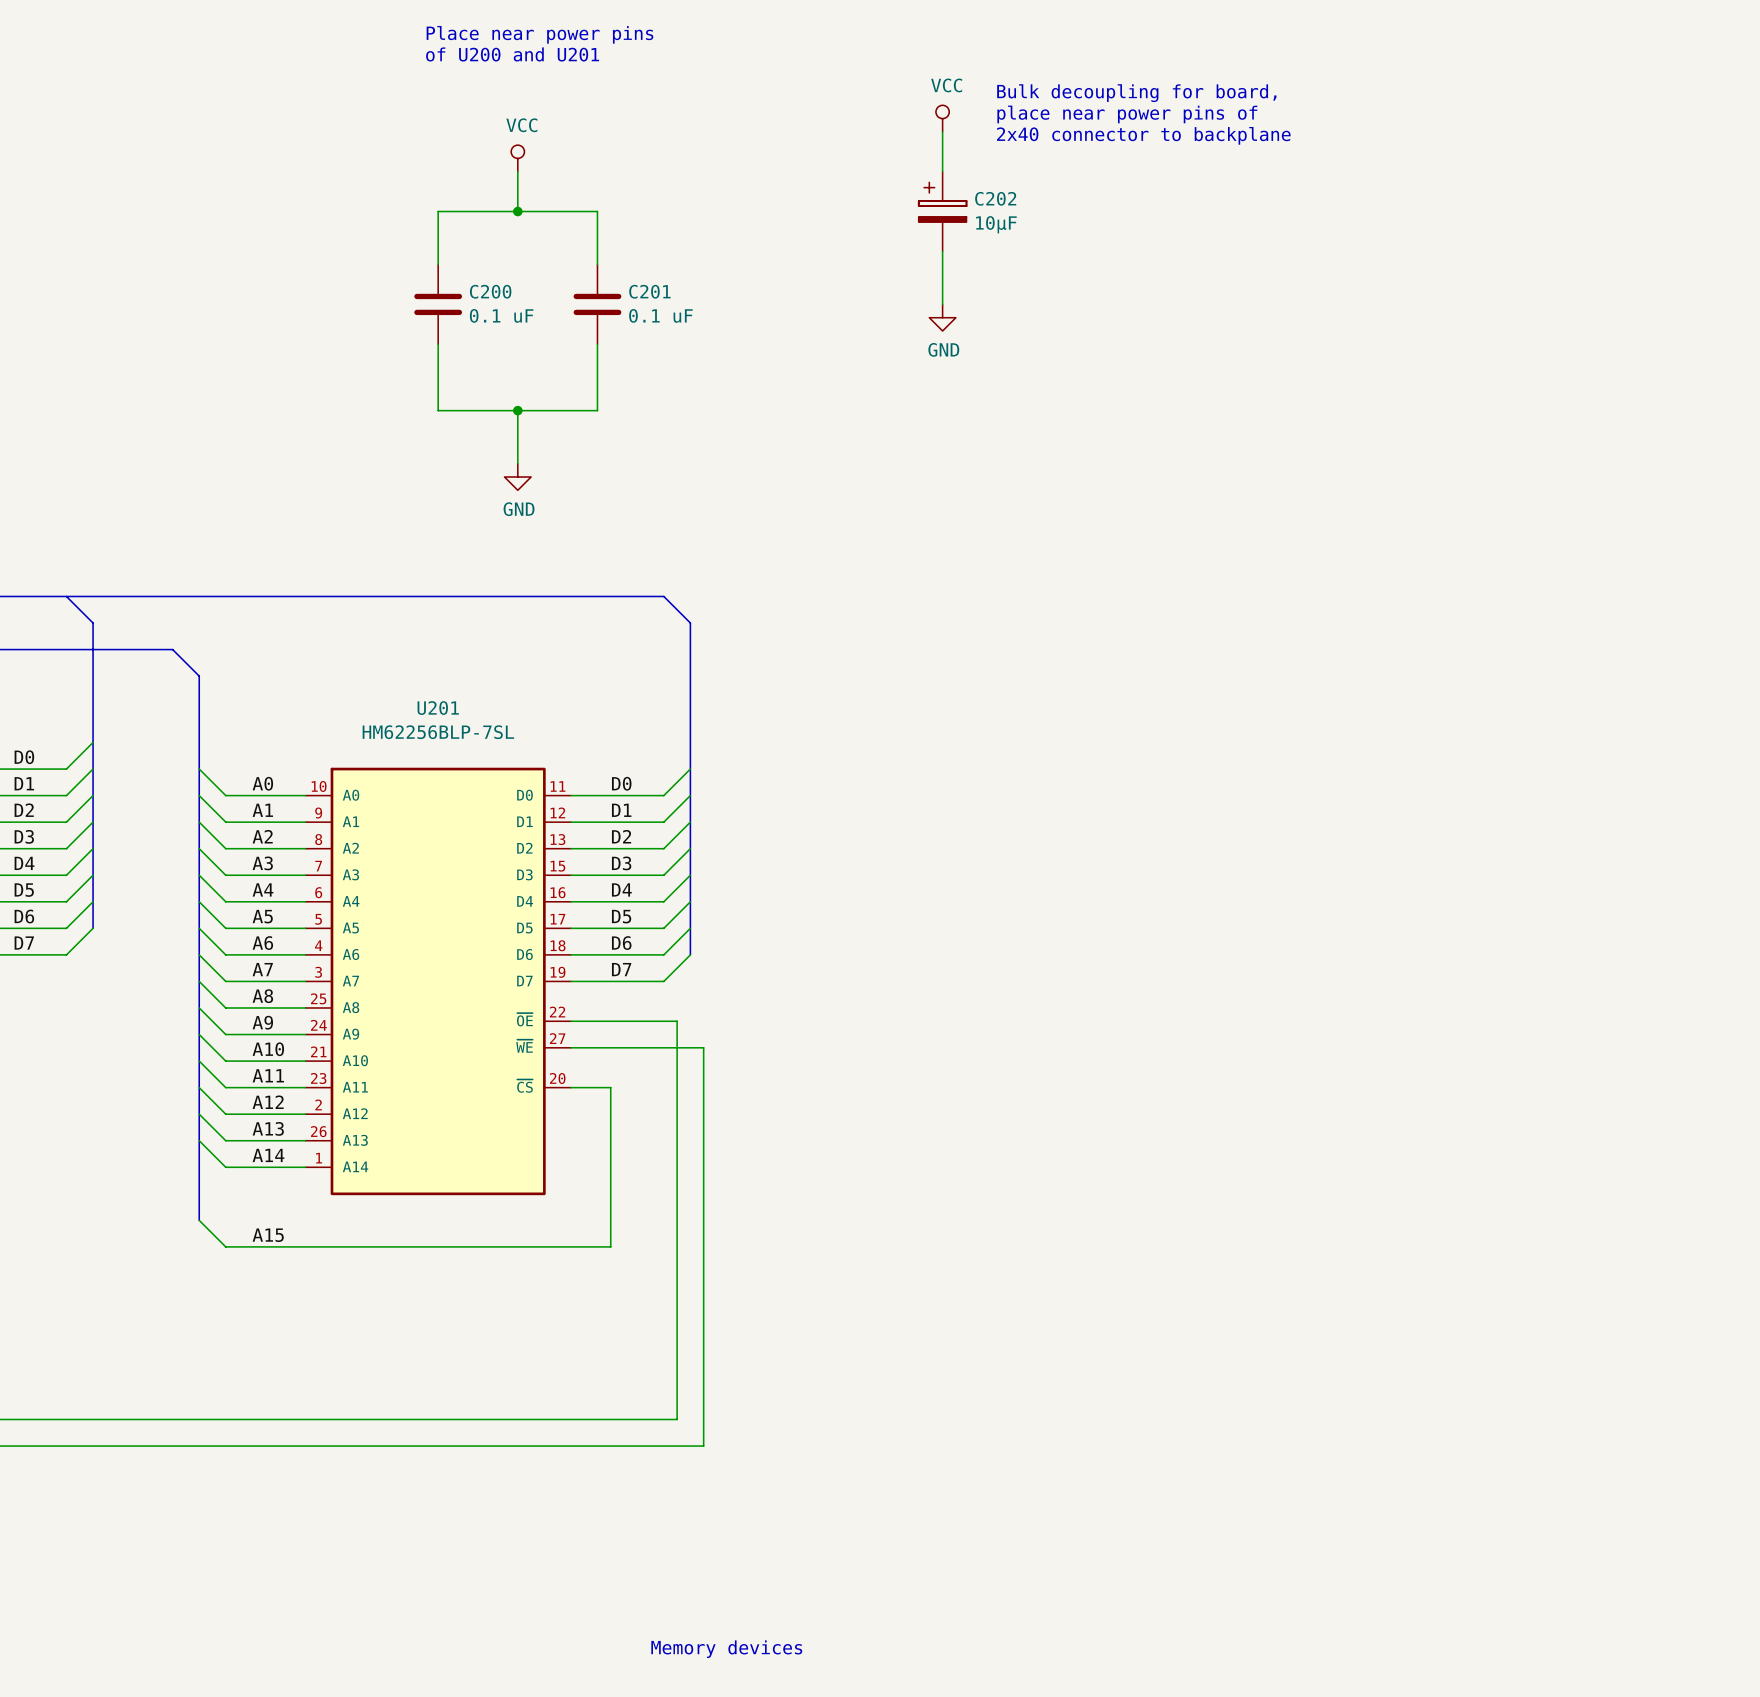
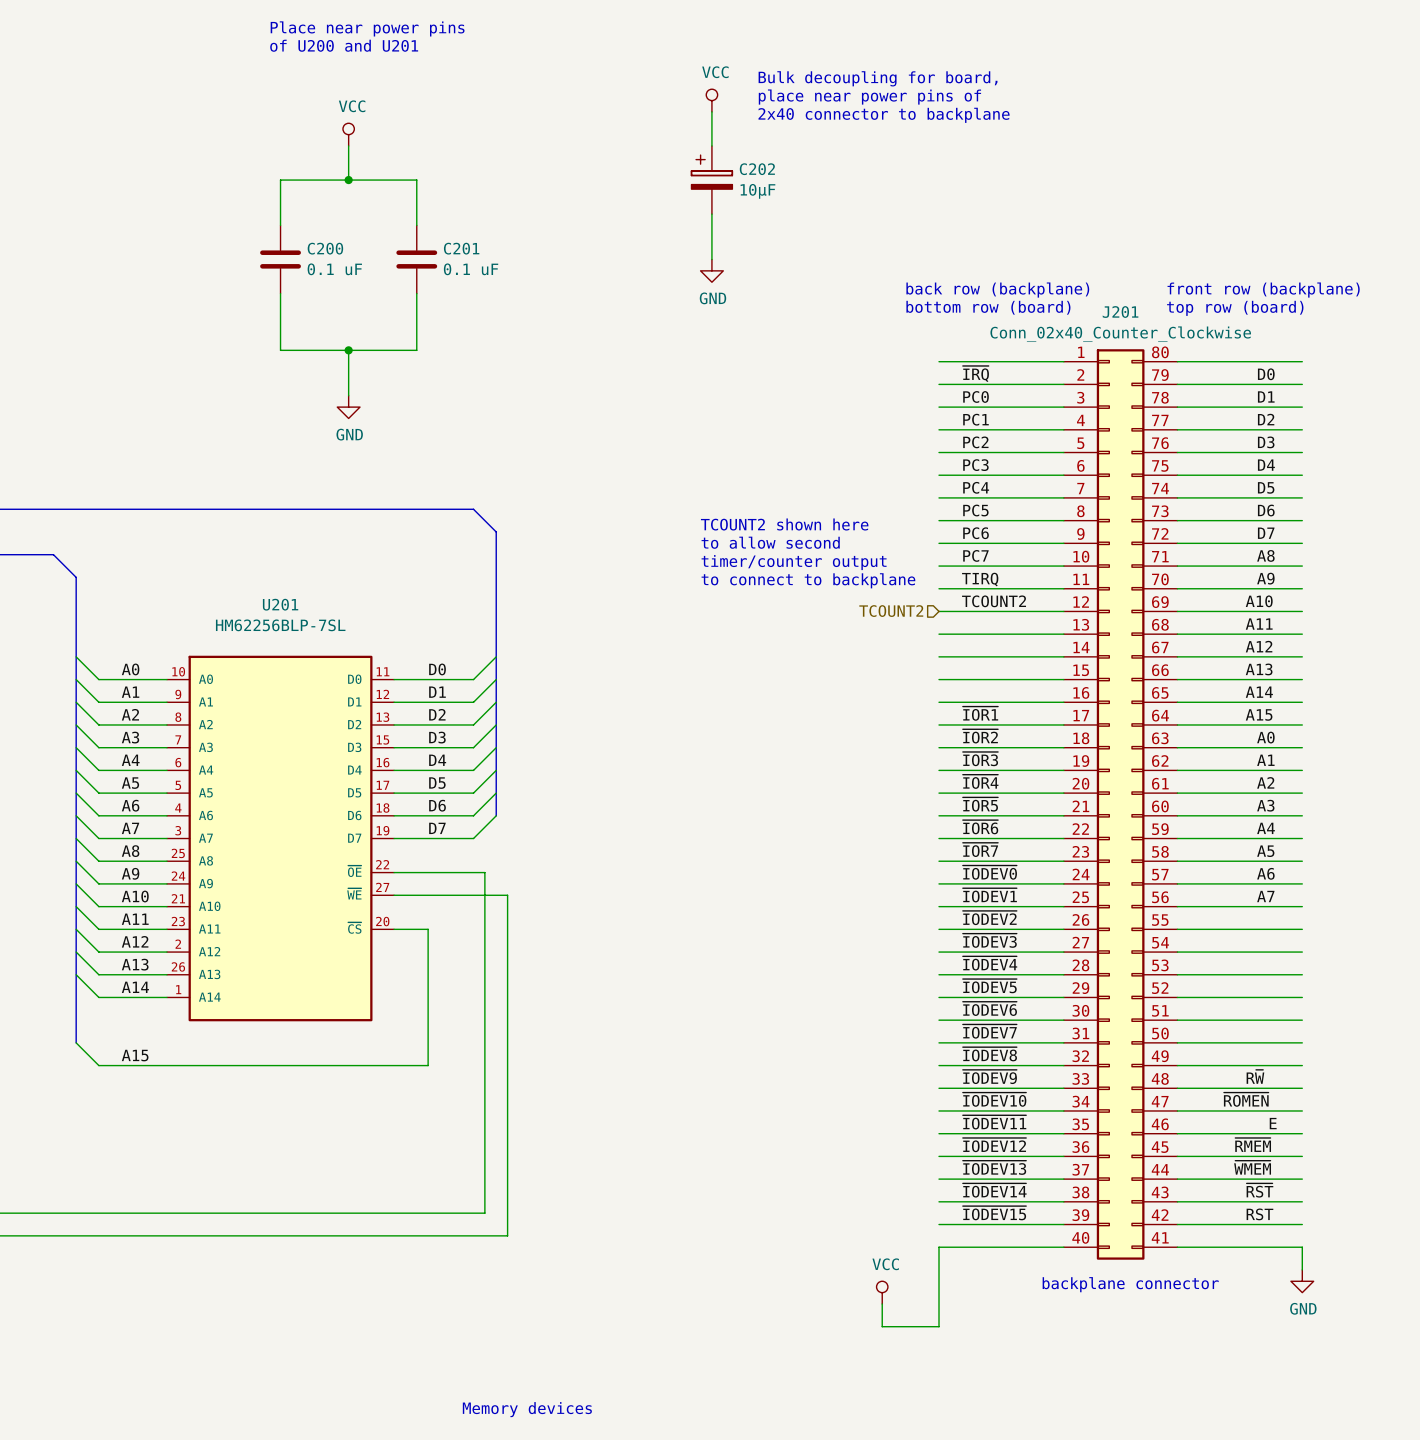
text: none -> back row (backplane) (997, 290)
text: none -> front row (backplane) (1263, 290)
text: none -> bottom row (board) (988, 307)
text: none -> top row (board) (1235, 308)
wire: none -> (939, 361) (1063, 361)
wire: none -> (1177, 361) (1302, 361)
label: none -> ~{IRQ} (975, 373)
label: none -> D0 (1266, 374)
wire: none -> (939, 384) (1063, 384)
wire: none -> (1177, 384) (1302, 384)
label: none -> PC0 (976, 396)
label: none -> D1 (1266, 396)
wire: none -> (939, 407) (1063, 407)
wire: none -> (1177, 407) (1302, 407)
label: none -> PC1 (975, 419)
label: none -> D2 (1266, 419)
wire: none -> (939, 429) (1063, 429)
wire: none -> (1177, 429) (1302, 429)
label: none -> PC2 (975, 442)
label: none -> D3 (1266, 442)
wire: none -> (939, 452) (1063, 452)
wire: none -> (1177, 452) (1302, 452)
label: none -> PC3 (975, 465)
label: none -> D4 (1266, 465)
wire: none -> (939, 475) (1063, 475)
wire: none -> (1177, 475) (1302, 475)
label: none -> PC4 (976, 487)
label: none -> D5 (1266, 487)
wire: none -> (939, 497) (1063, 497)
wire: none -> (1177, 497) (1302, 497)
label: none -> PC5 (975, 510)
label: none -> D6 (1266, 510)
wire: none -> (939, 520) (1063, 520)
wire: none -> (1177, 520) (1302, 520)
text: none -> TCOUNT2 shown here (784, 524)
label: none -> PC6 (976, 533)
label: none -> D7 (1266, 533)
text: none -> to allow second (770, 542)
wire: none -> (939, 543) (1063, 543)
wire: none -> (1177, 543) (1302, 543)
label: none -> PC7 (975, 555)
label: none -> A8 (1265, 555)
text: none -> timer/counter output (794, 562)
wire: none -> (939, 566) (1063, 566)
wire: none -> (1177, 566) (1302, 566)
label: none -> A9 (1265, 578)
label: none -> TIRQ (980, 579)
text: none -> to connect to backplane (808, 580)
wire: none -> (939, 588) (1063, 588)
wire: none -> (1177, 588) (1302, 588)
label: none -> TCOUNT2 (994, 601)
label: none -> A10 (1259, 601)
hierarchical label: none -> TCOUNT2 (891, 611)
wire: none -> (939, 611) (1063, 611)
wire: none -> (1177, 611) (1302, 611)
label: none -> A11 (1259, 624)
wire: none -> (939, 634) (1063, 634)
wire: none -> (1177, 634) (1302, 634)
label: none -> A12 (1259, 646)
wire: none -> (939, 656) (1063, 656)
wire: none -> (1177, 656) (1302, 656)
label: none -> A13 (1259, 669)
wire: none -> (939, 679) (1063, 679)
wire: none -> (1177, 679) (1302, 679)
label: none -> A14 (1259, 692)
wire: none -> (939, 702) (1063, 702)
wire: none -> (1177, 702) (1302, 702)
label: none -> ~{IOR1} (980, 713)
label: none -> A15 (1259, 714)
wire: none -> (939, 724) (1063, 724)
wire: none -> (1177, 724) (1302, 724)
label: none -> ~{IOR2} (980, 736)
label: none -> A0 (1265, 737)
wire: none -> (939, 747) (1063, 747)
wire: none -> (1177, 747) (1302, 747)
label: none -> ~{IOR3} (980, 759)
label: none -> A1 (1265, 760)
wire: none -> (939, 770) (1063, 770)
wire: none -> (1177, 770) (1302, 770)
label: none -> ~{IOR4} (980, 781)
label: none -> A2 (1265, 782)
wire: none -> (939, 793) (1063, 793)
wire: none -> (1177, 793) (1302, 793)
label: none -> ~{IOR5} (980, 804)
J201: none -> Conn_02x40_Counter_Clockwise (1120, 804)
label: none -> A3 (1265, 805)
wire: none -> (939, 815) (1063, 815)
wire: none -> (1177, 815) (1302, 815)
label: none -> ~{IOR6} (980, 827)
label: none -> A4 (1266, 828)
wire: none -> (939, 838) (1063, 838)
wire: none -> (1177, 838) (1302, 838)
label: none -> ~{IOR7} (980, 849)
label: none -> A5 (1265, 851)
wire: none -> (939, 861) (1063, 861)
wire: none -> (1177, 861) (1302, 861)
label: none -> ~{IODEV0} (989, 872)
label: none -> A6 (1265, 873)
wire: none -> (939, 883) (1063, 883)
wire: none -> (1177, 883) (1302, 883)
label: none -> ~{IODEV1} (989, 895)
label: none -> A7 (1265, 896)
wire: none -> (939, 906) (1063, 906)
wire: none -> (1177, 906) (1302, 906)
label: none -> ~{IODEV2} (989, 918)
wire: none -> (939, 929) (1063, 929)
wire: none -> (1177, 929) (1302, 929)
label: none -> ~{IODEV3} (989, 940)
wire: none -> (939, 952) (1063, 952)
wire: none -> (1177, 952) (1302, 952)
label: none -> ~{IODEV4} (990, 963)
wire: none -> (939, 974) (1063, 974)
wire: none -> (1177, 974) (1302, 974)
label: none -> ~{IODEV5} (989, 986)
wire: none -> (939, 997) (1063, 997)
wire: none -> (1177, 997) (1302, 997)
label: none -> ~{IODEV6} (989, 1008)
wire: none -> (939, 1020) (1063, 1020)
wire: none -> (1177, 1020) (1302, 1020)
label: none -> ~{IODEV7} (989, 1031)
wire: none -> (939, 1042) (1063, 1042)
wire: none -> (1177, 1042) (1302, 1042)
label: none -> ~{IODEV8} (989, 1054)
wire: none -> (939, 1065) (1063, 1065)
wire: none -> (1177, 1065) (1302, 1065)
label: none -> ~{IODEV9} (989, 1076)
label: none -> R~{W} (1255, 1076)
wire: none -> (939, 1088) (1063, 1088)
wire: none -> (1177, 1088) (1302, 1088)
label: none -> ~{IODEV10} (994, 1099)
label: none -> ~{ROMEN} (1246, 1099)
wire: none -> (939, 1110) (1063, 1110)
wire: none -> (1177, 1110) (1302, 1110)
label: none -> ~{IODEV11} (994, 1122)
label: none -> E (1273, 1123)
wire: none -> (939, 1133) (1063, 1133)
wire: none -> (1177, 1133) (1302, 1133)
label: none -> ~{IODEV12} (994, 1145)
label: none -> ~{RMEM} (1253, 1144)
wire: none -> (939, 1156) (1063, 1156)
wire: none -> (1177, 1156) (1302, 1156)
label: none -> ~{IODEV13} (994, 1167)
label: none -> ~{WMEM} (1252, 1167)
wire: none -> (939, 1179) (1063, 1179)
wire: none -> (1177, 1179) (1302, 1179)
label: none -> ~{IODEV14} (994, 1190)
label: none -> ~{RST} (1259, 1190)
wire: none -> (939, 1201) (1063, 1201)
wire: none -> (1177, 1201) (1302, 1201)
label: none -> ~{IODEV15} (994, 1213)
label: none -> RST (1259, 1214)
wire: none -> (939, 1224) (1063, 1224)
wire: none -> (1177, 1224) (1302, 1224)
wire: none -> (1063, 1247) (939, 1247) (939, 1326) (882, 1326) (882, 1303)
wire: none -> (1177, 1247) (1302, 1247) (1302, 1269)
power symbol: none -> GND (1302, 1281)
text: none -> backplane connector (1130, 1284)
power symbol: none -> VCC (882, 1292)

